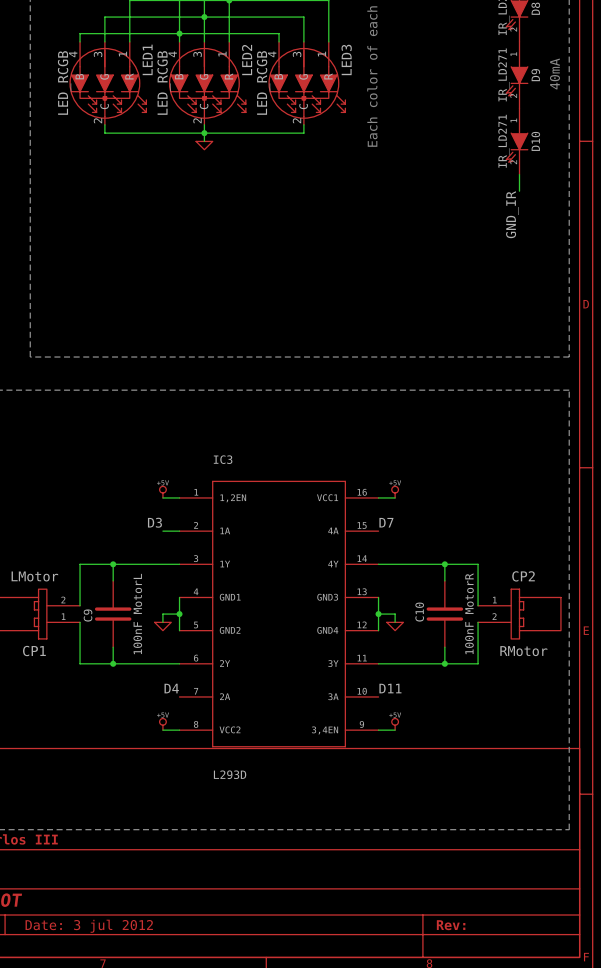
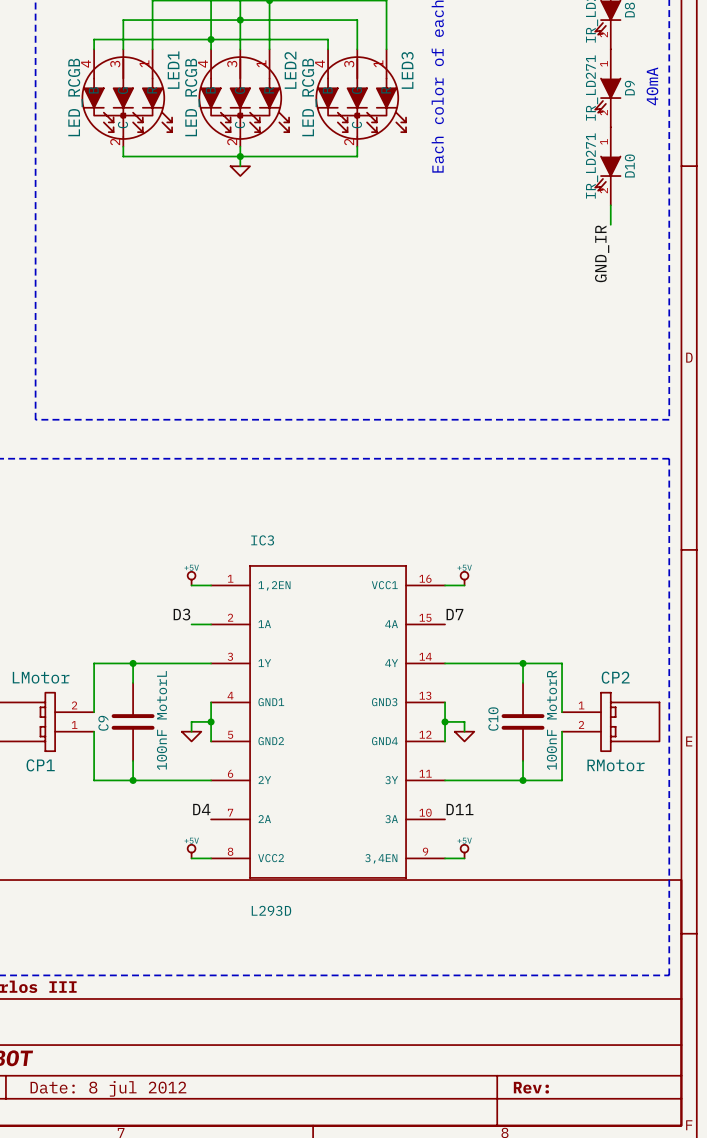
title block: Date: 3 jul 2012 (89, 926) -> Date: 8 jul 2012 (108, 1088)

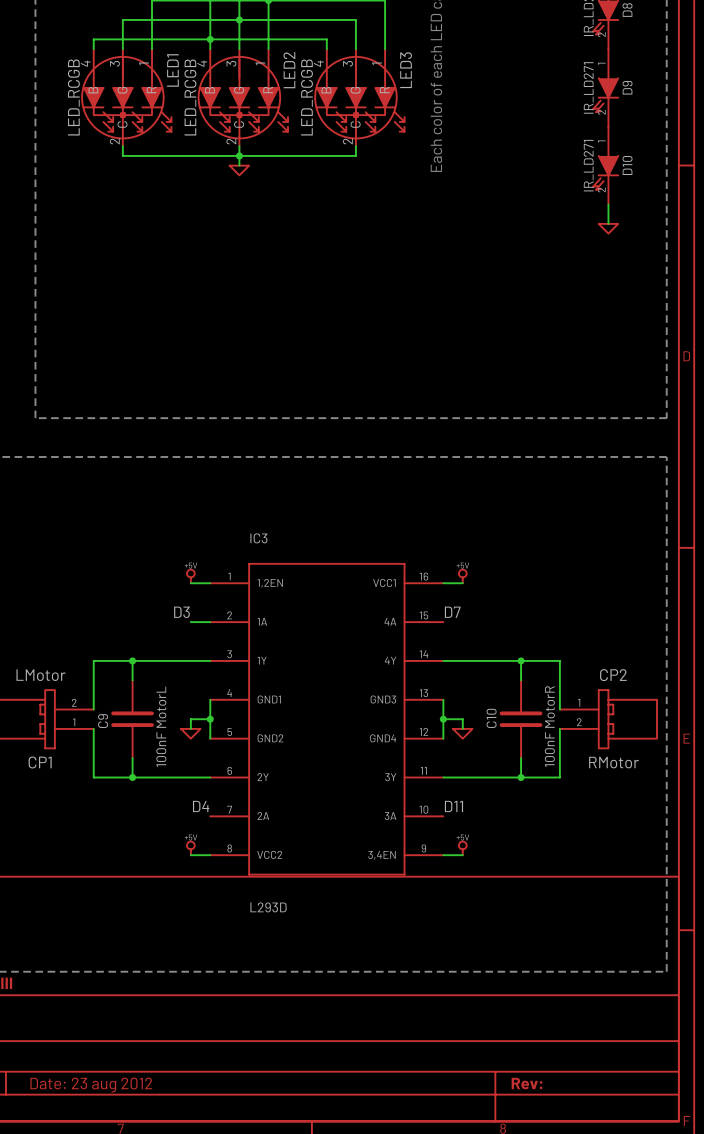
text: 40mA (652, 86) -> none
power symbol: none -> (608, 228)
label: GND_IR (602, 253) -> none
title block: Date: 8 jul 2012 (108, 1088) -> Date: 23 aug 2012 (91, 1085)

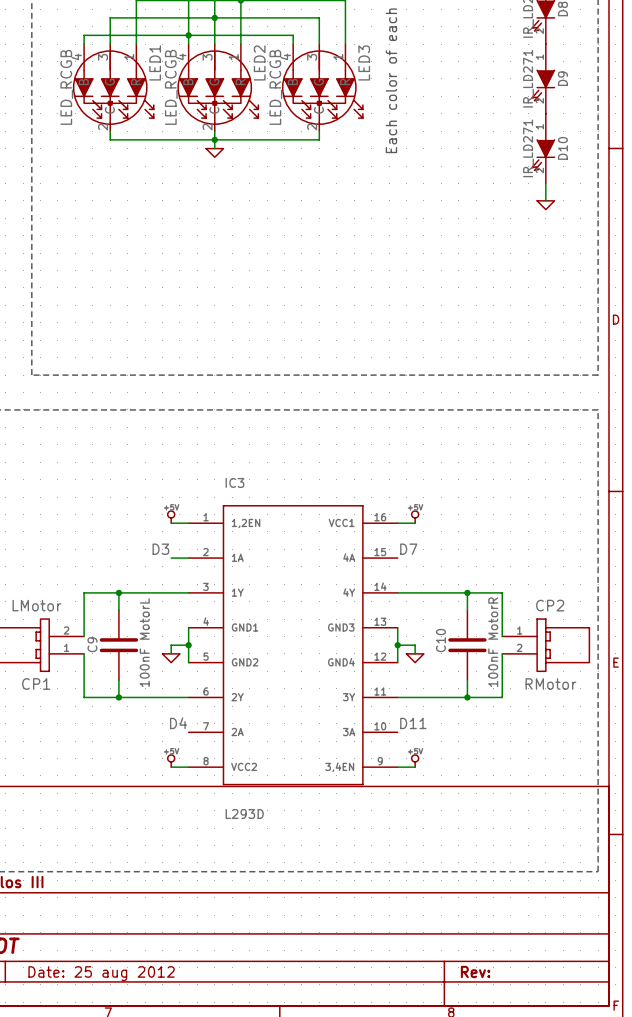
title block: Date: 23 aug 2012 (91, 1085) -> Date: 25 aug 2012 (101, 973)

